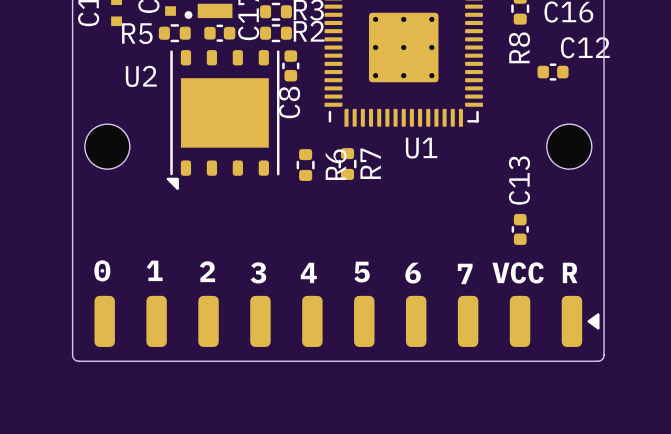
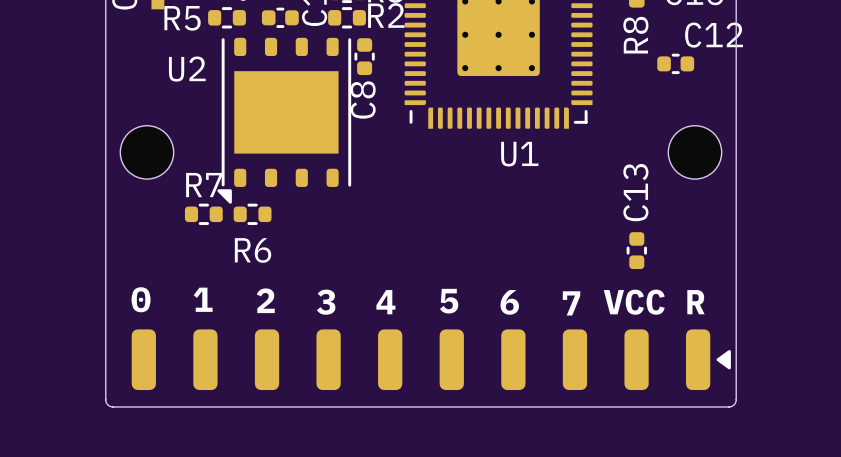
R7 rotation: 0° (347, 164) -> 90° clockwise (203, 214)
R7 position: (347, 164) -> (203, 214)
R6 rotation: 0° (305, 165) -> 90° clockwise (252, 214)
R6 position: (305, 165) -> (252, 214)

